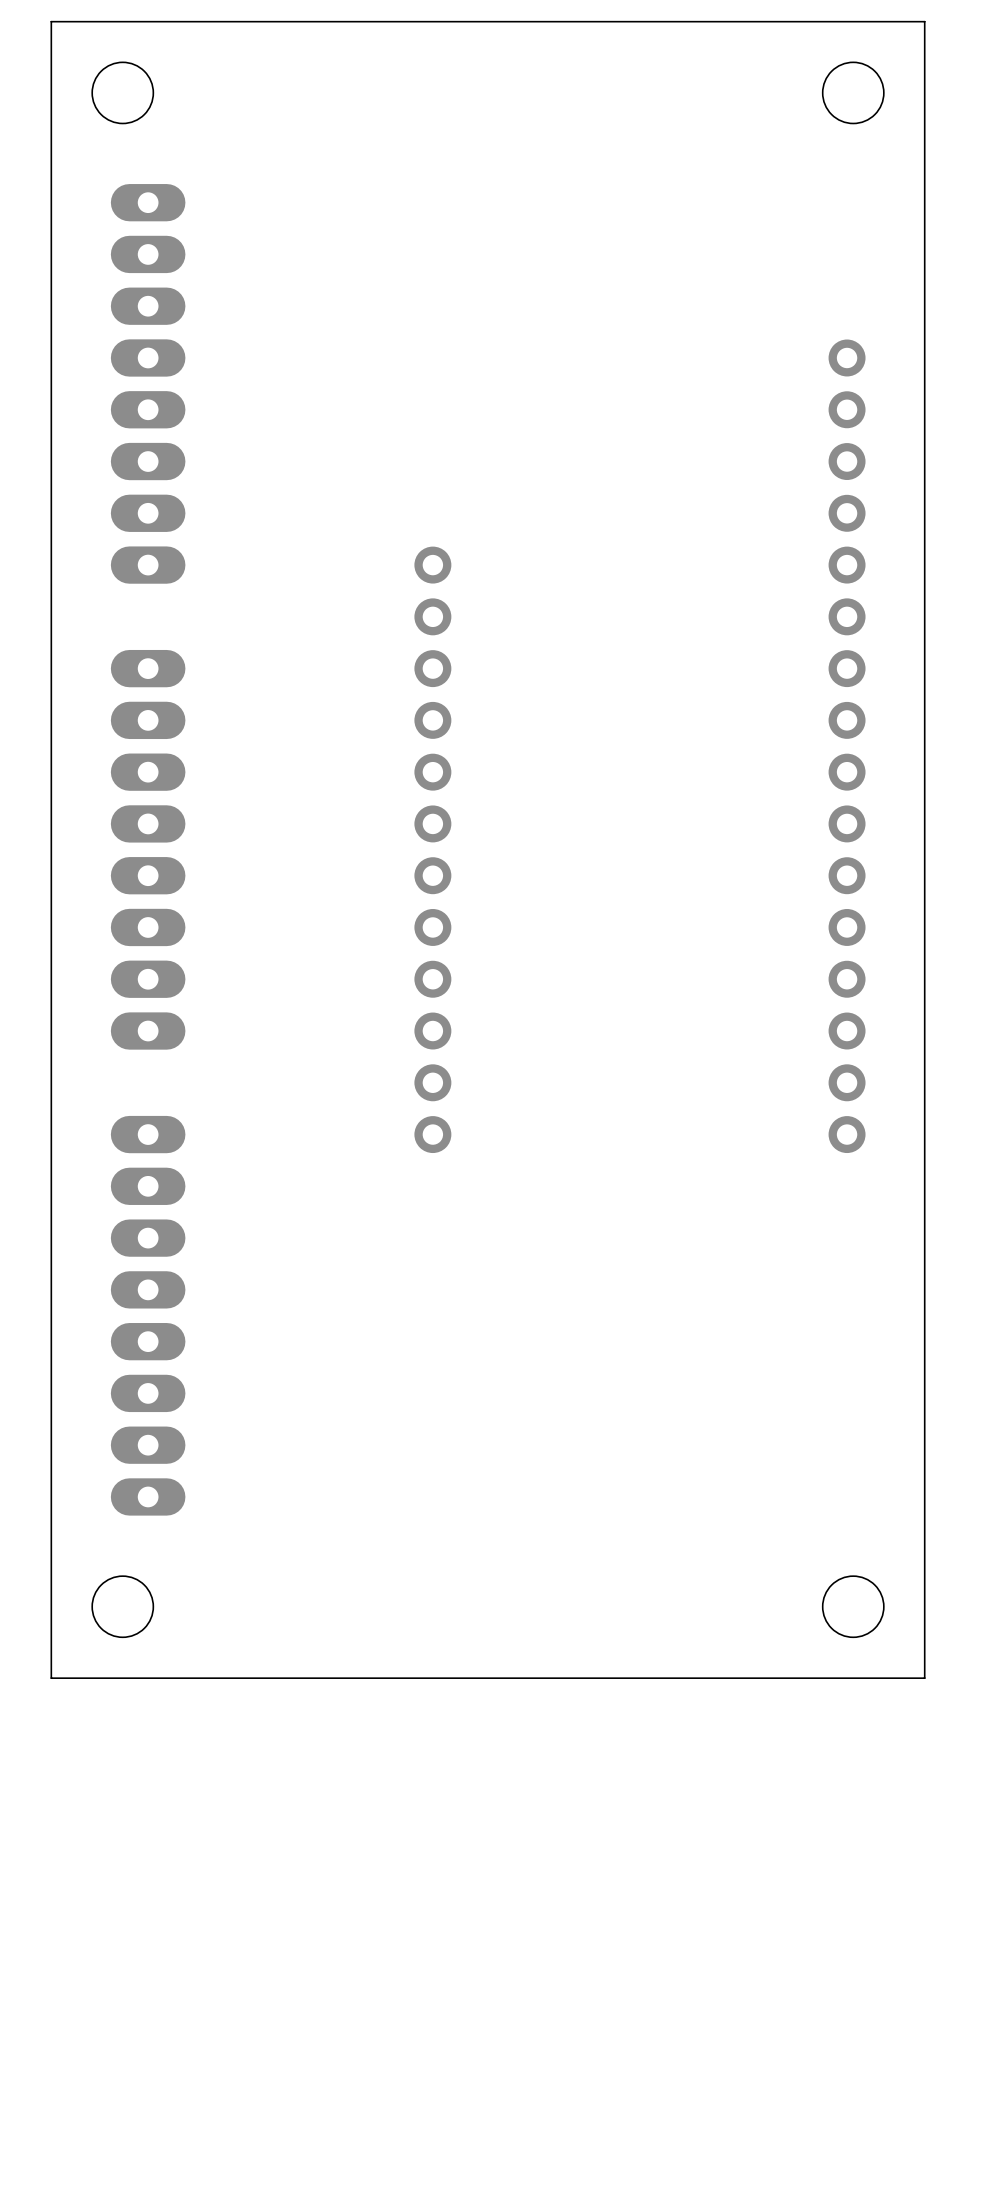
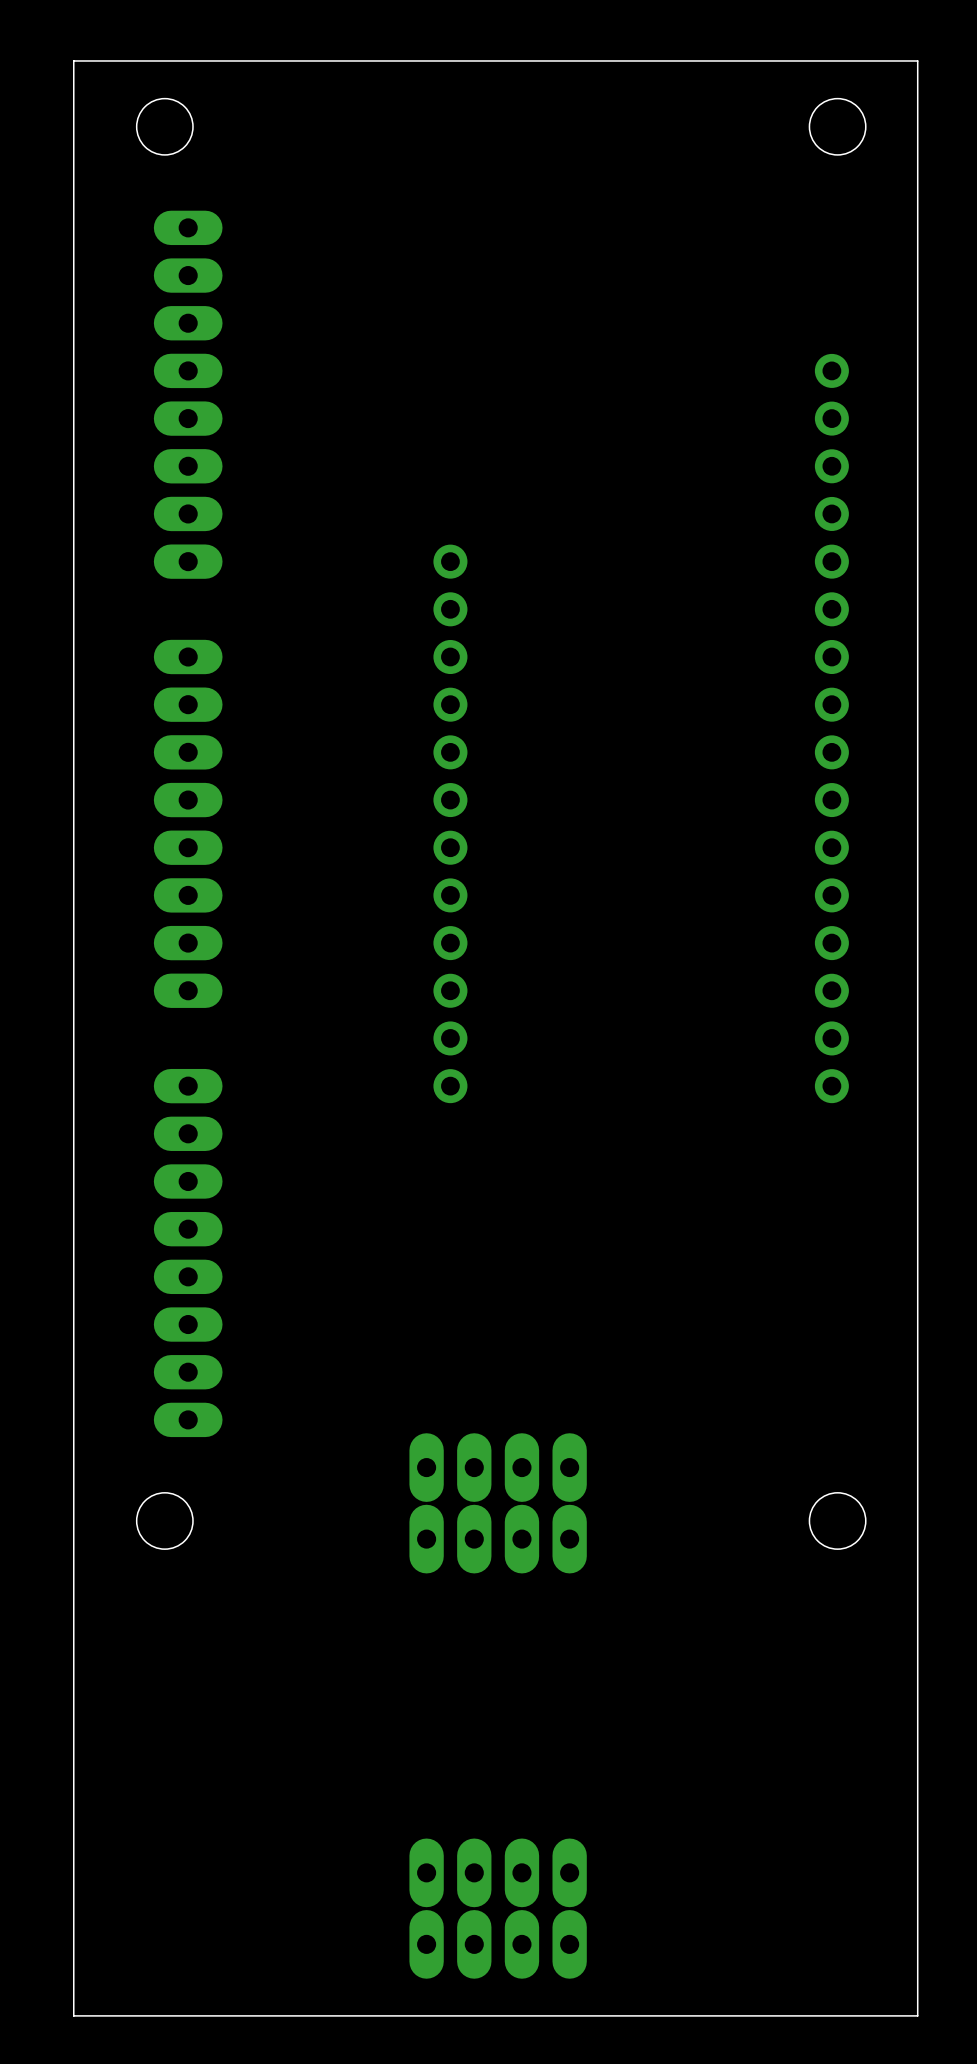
board edge: (924, 21) (51, 21) (51, 1678) (924, 1678) (924, 21) -> (917, 60) (917, 2015) (73, 2015) (73, 60) (917, 60)
part: none -> (498, 1467)
part: none -> (498, 1539)
part: none -> (498, 1872)
part: none -> (498, 1944)

